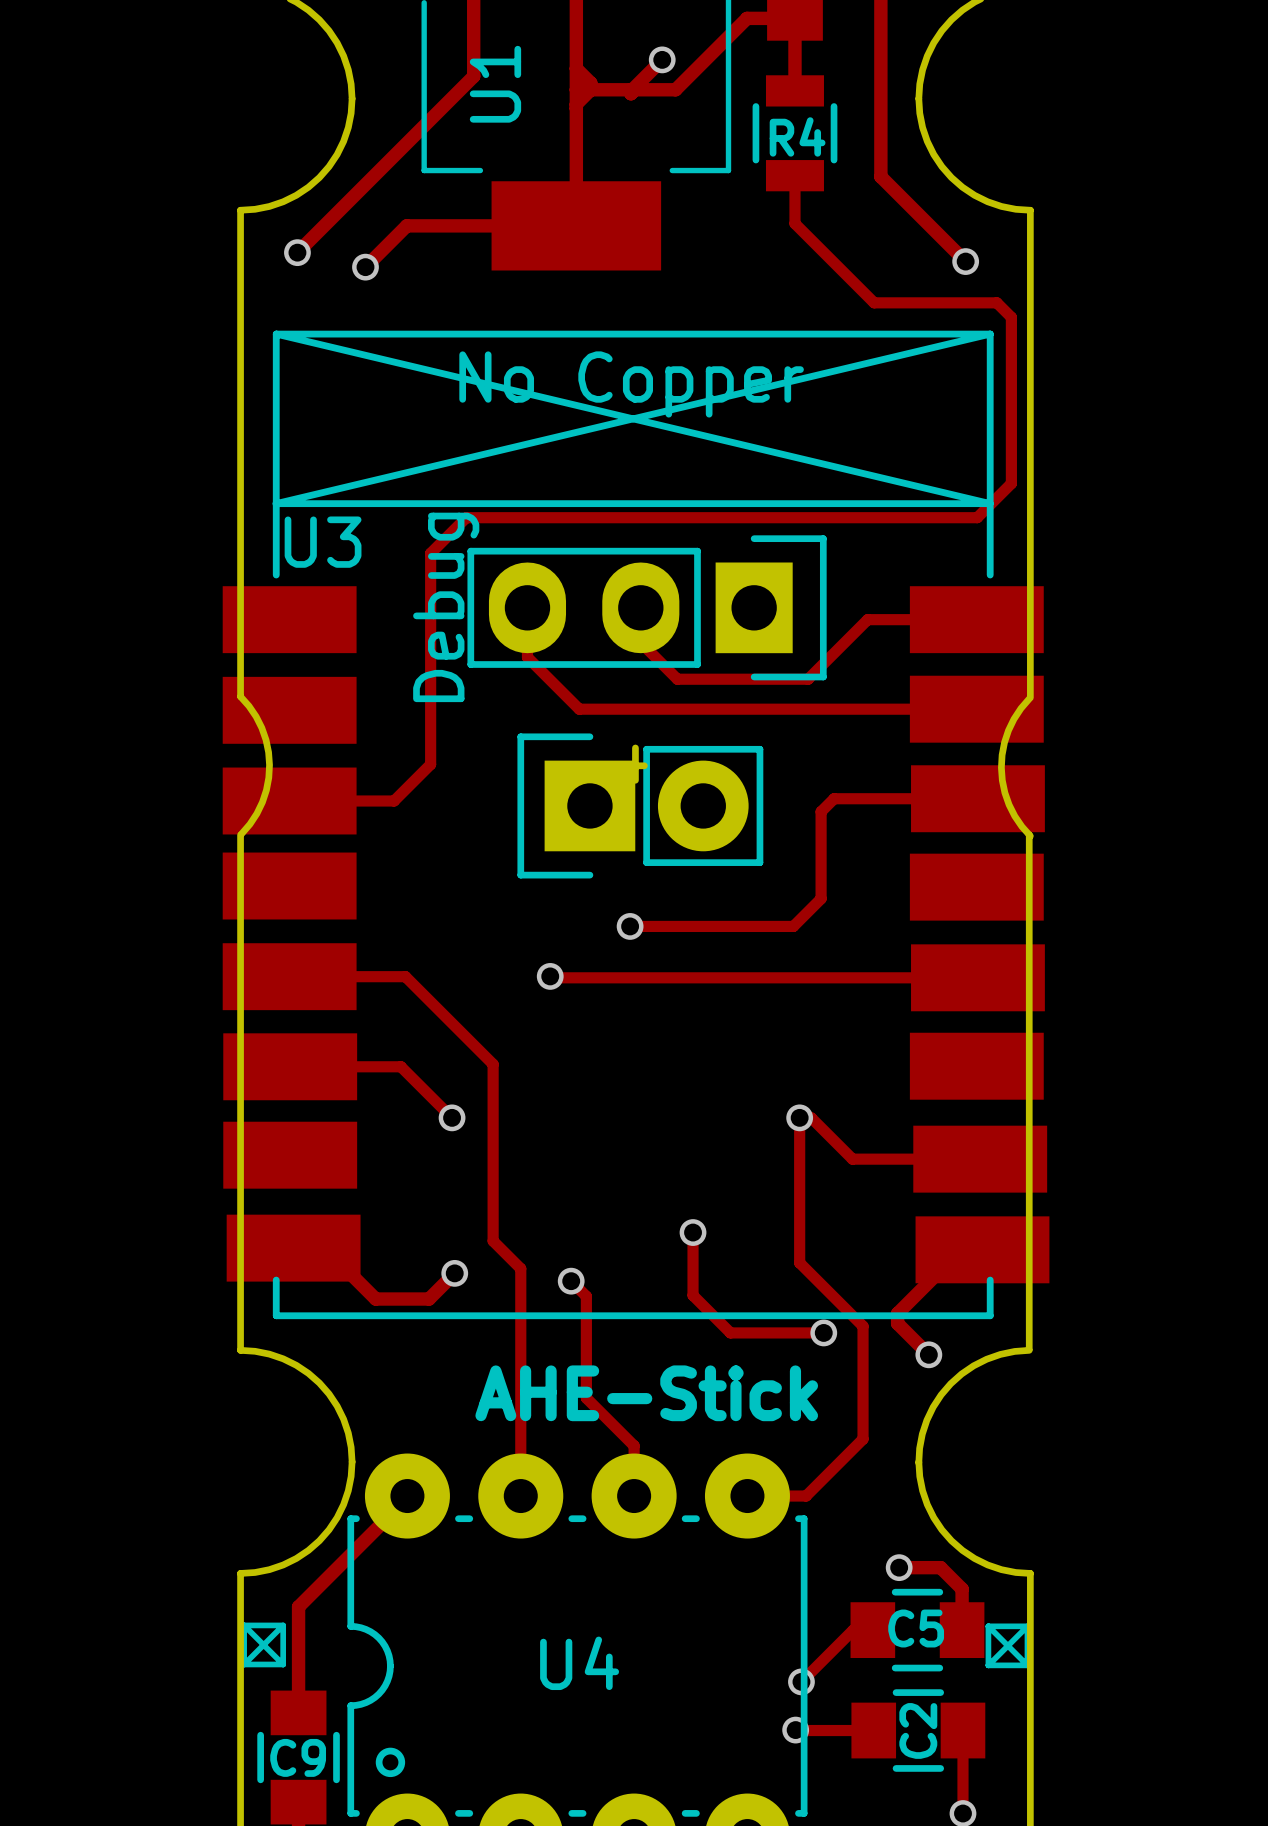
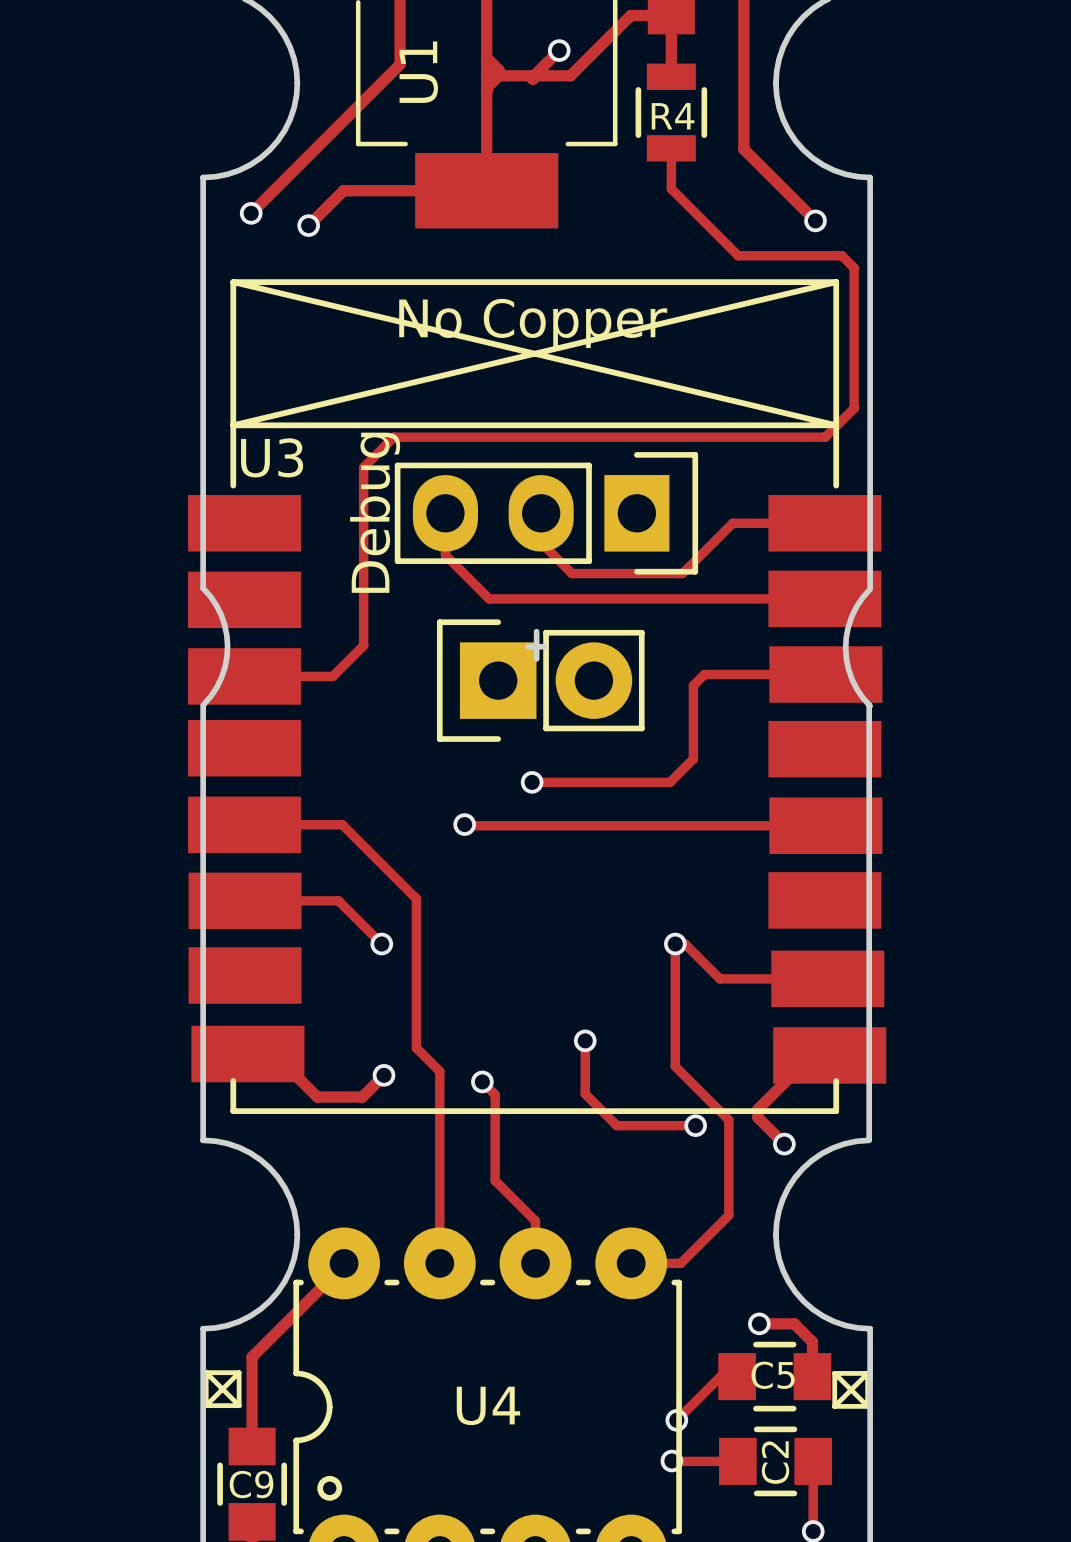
text: AHE-Stick (646, 1393) -> none

